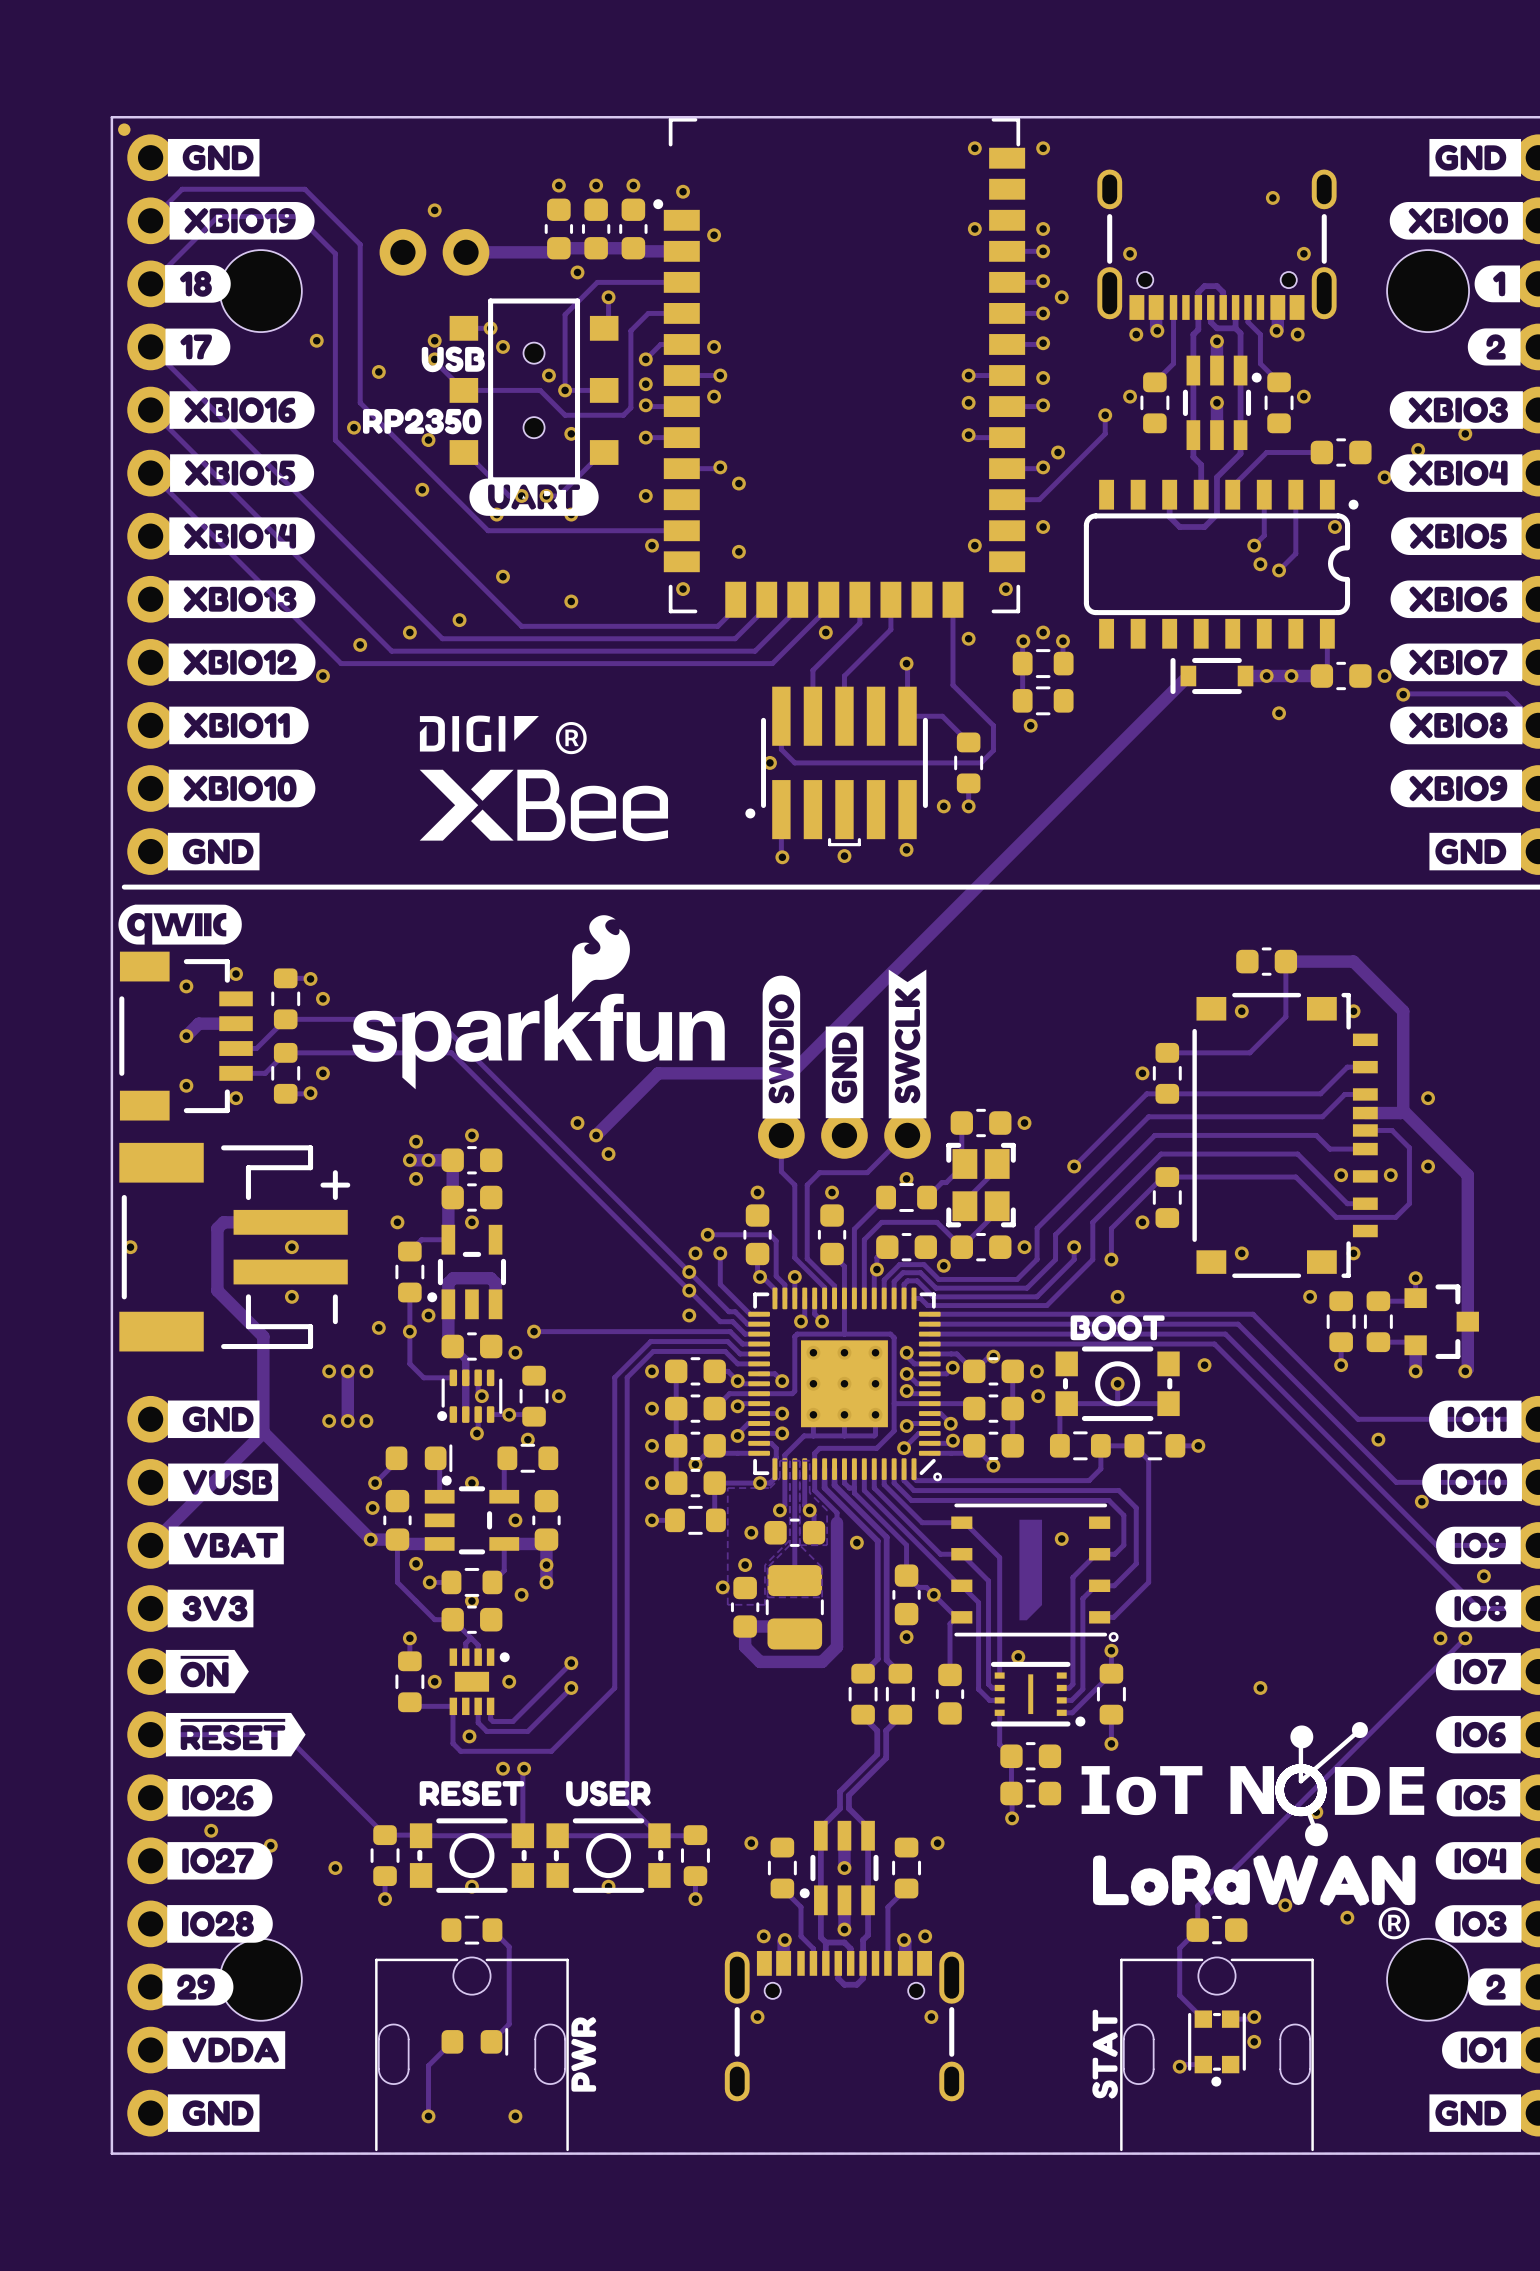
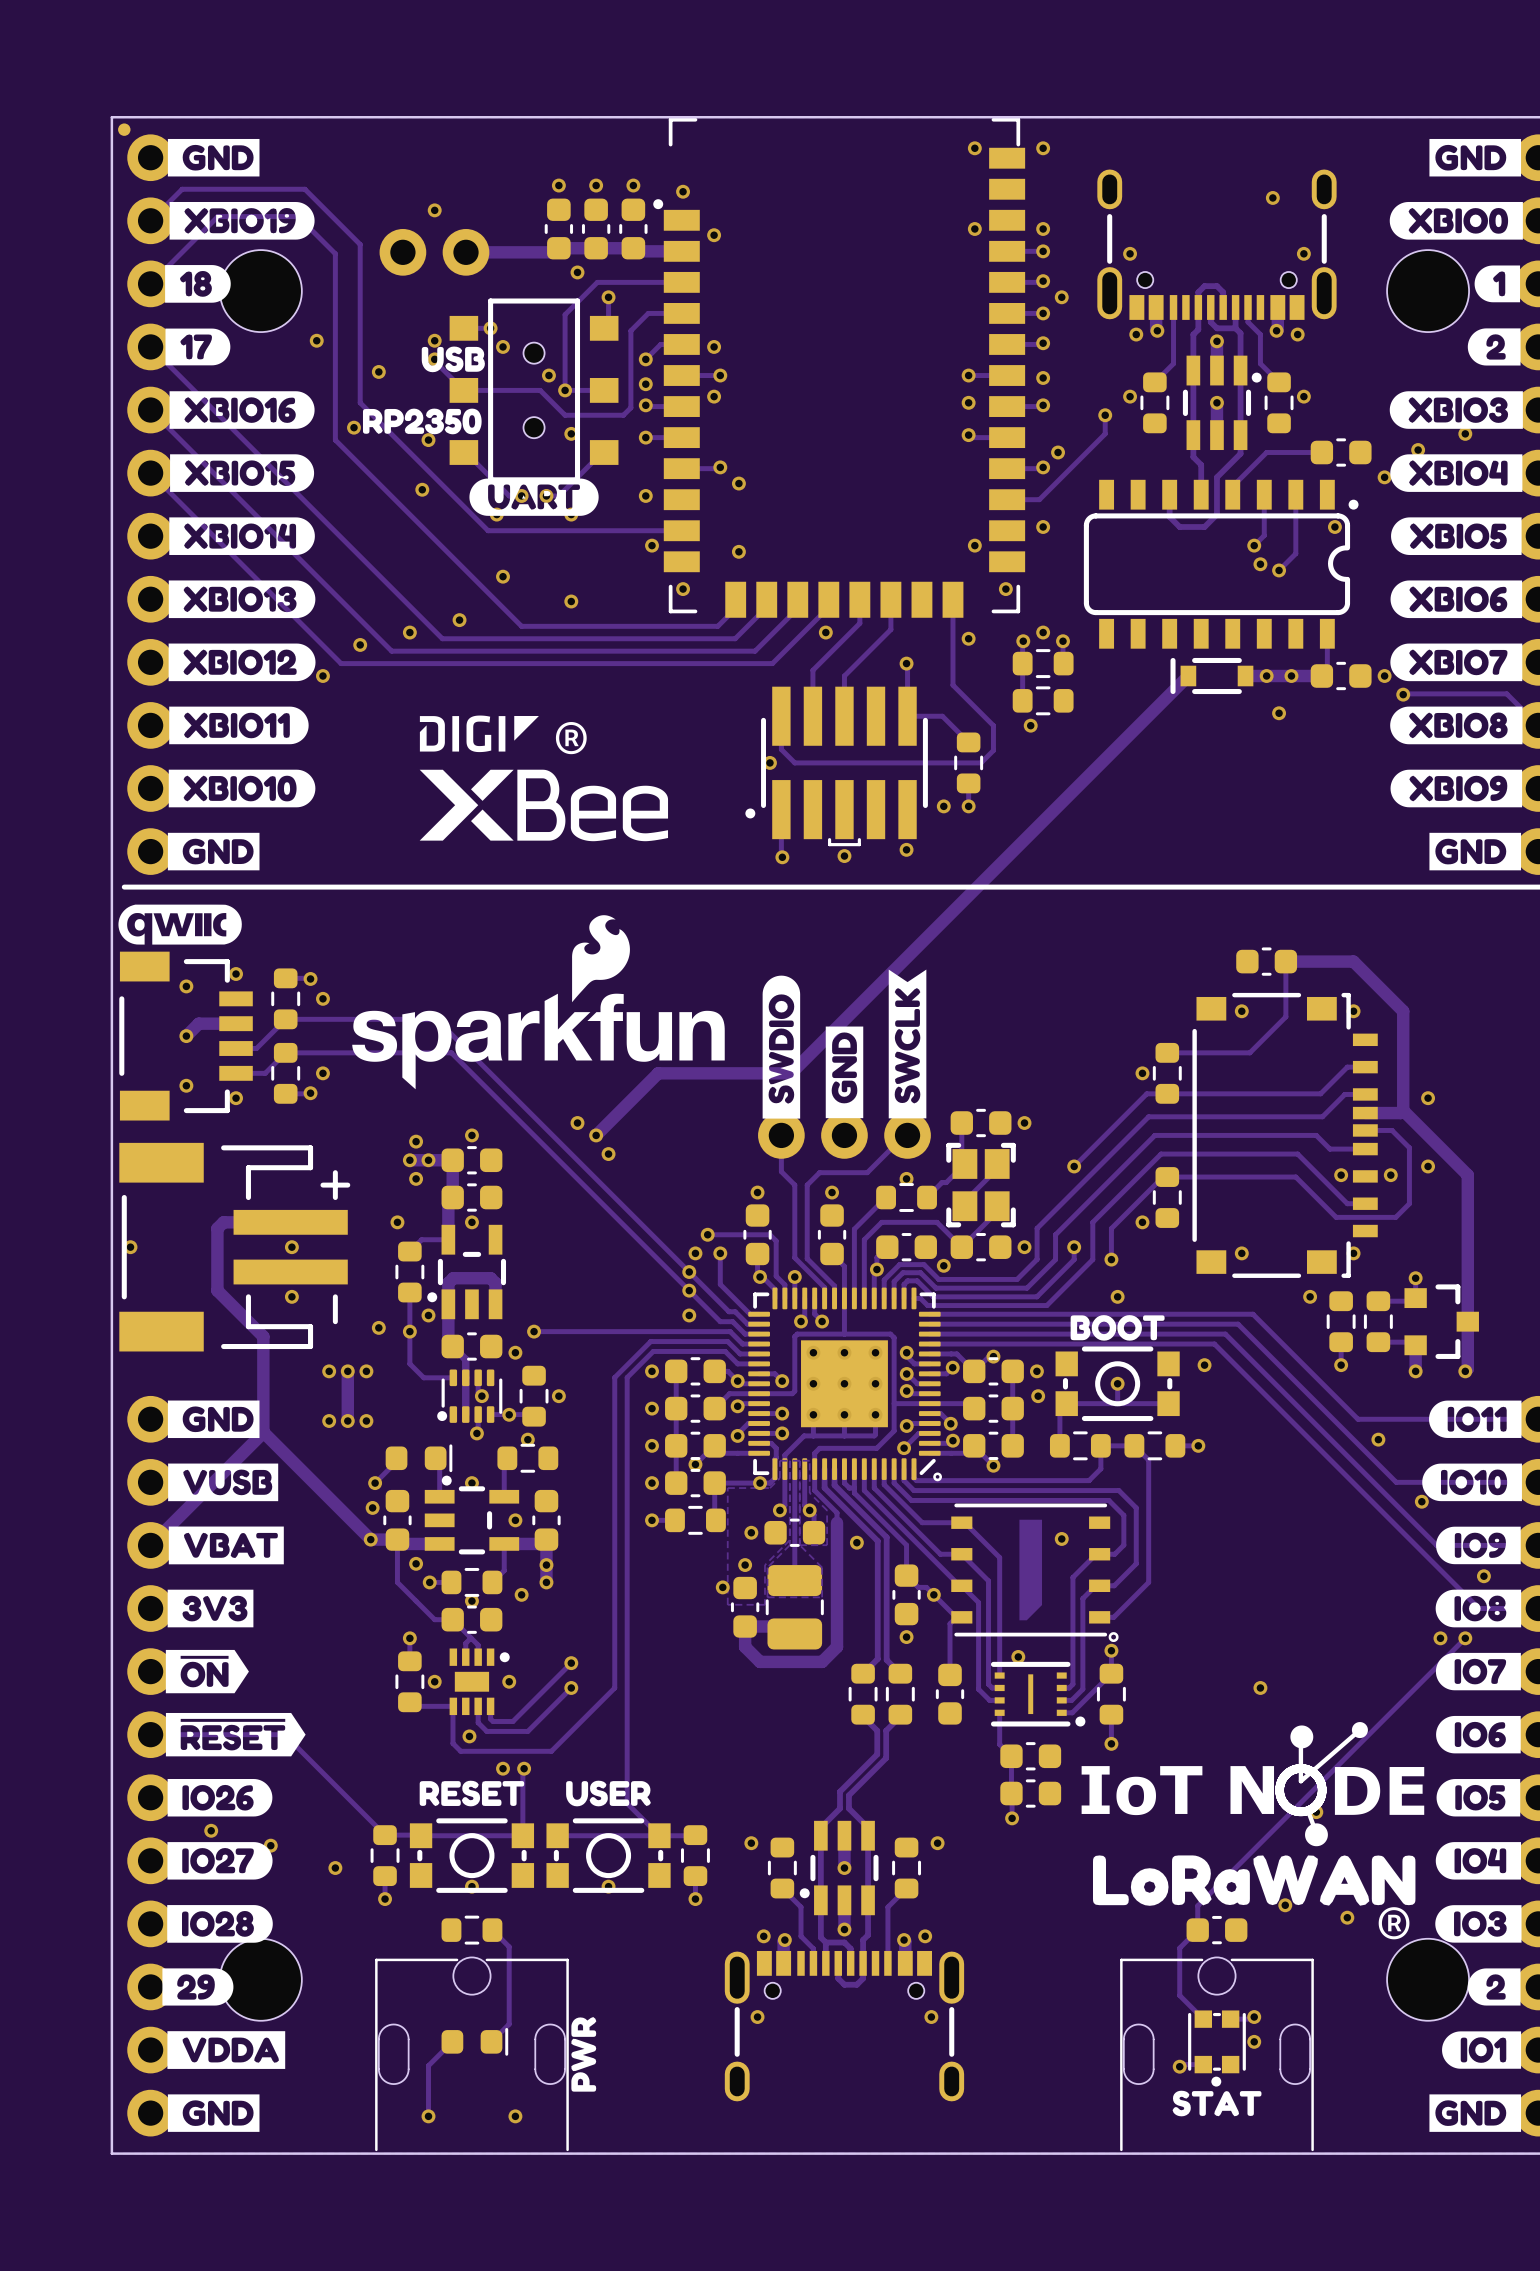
drawing: [1092, 2009, 1118, 2099] -> none
drawing: none -> [1172, 2090, 1262, 2117]

